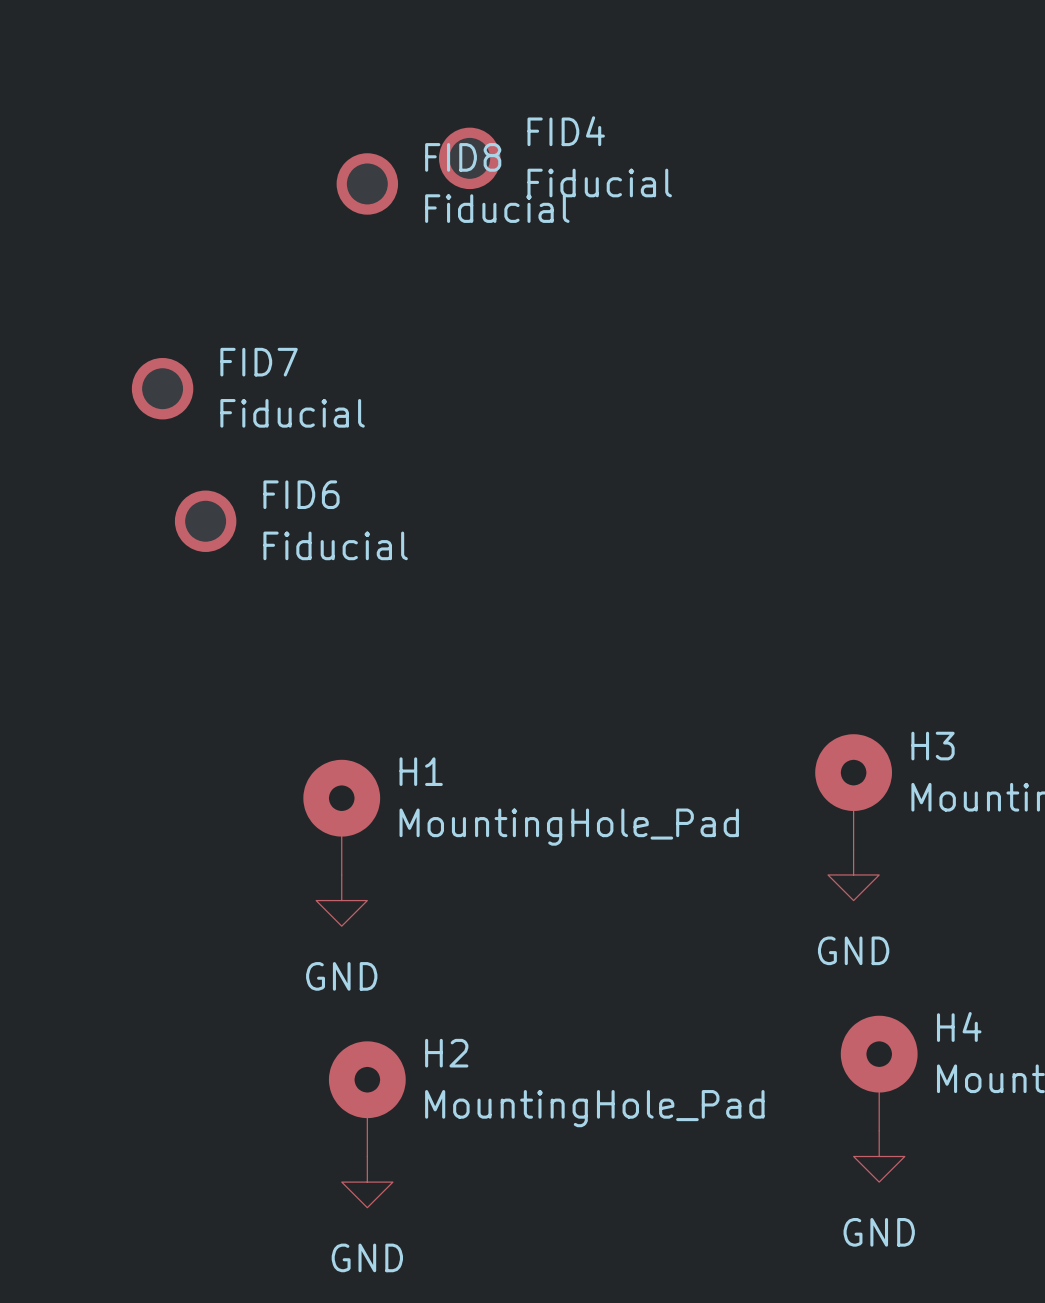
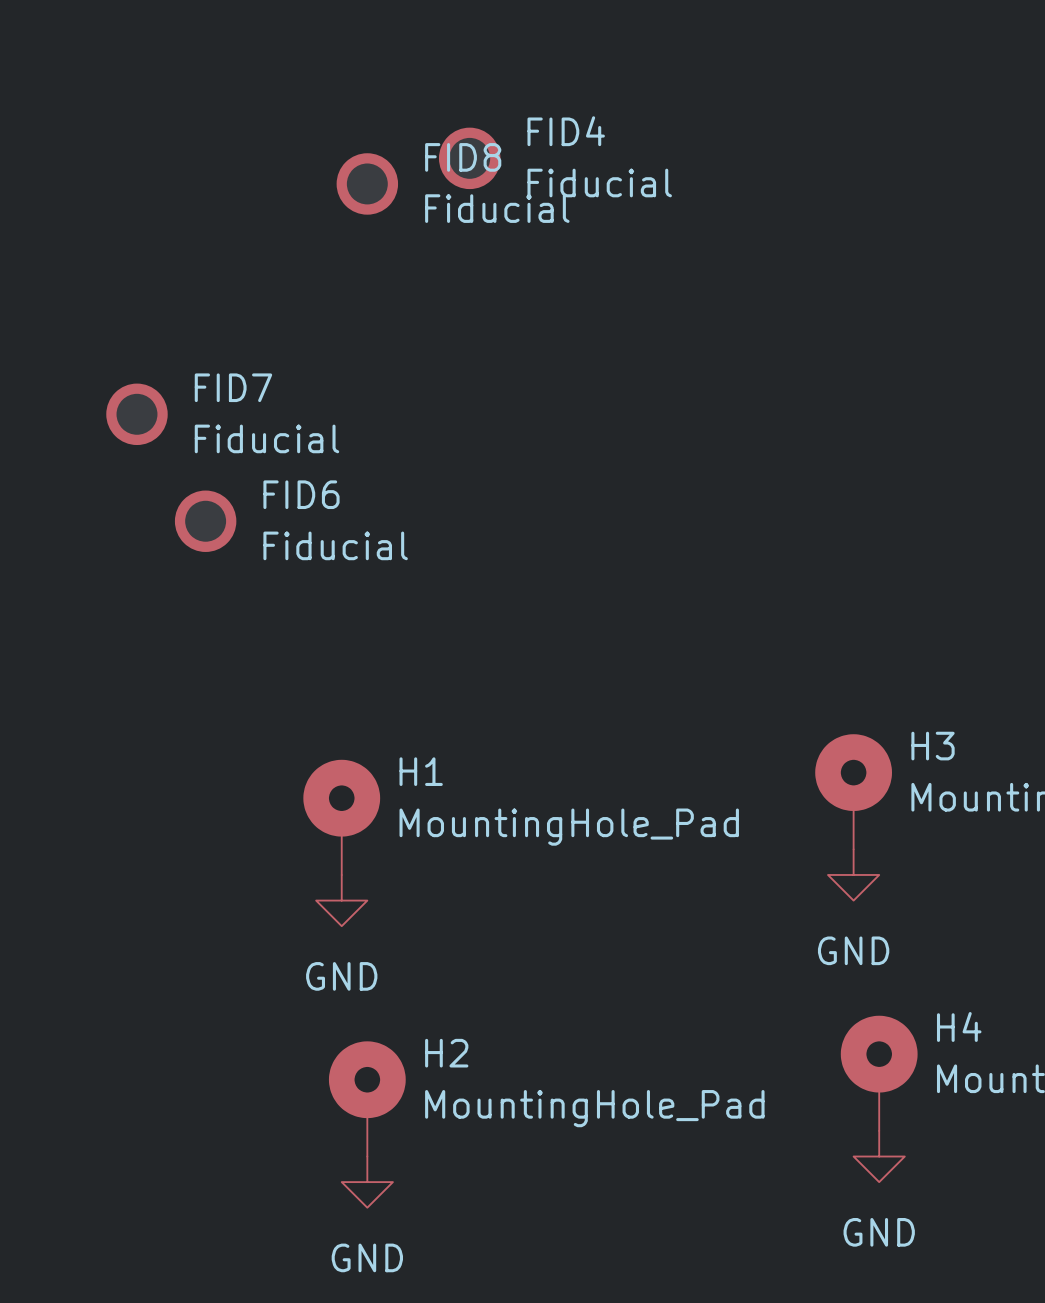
FID7 position: (162, 388) -> (136, 414)

